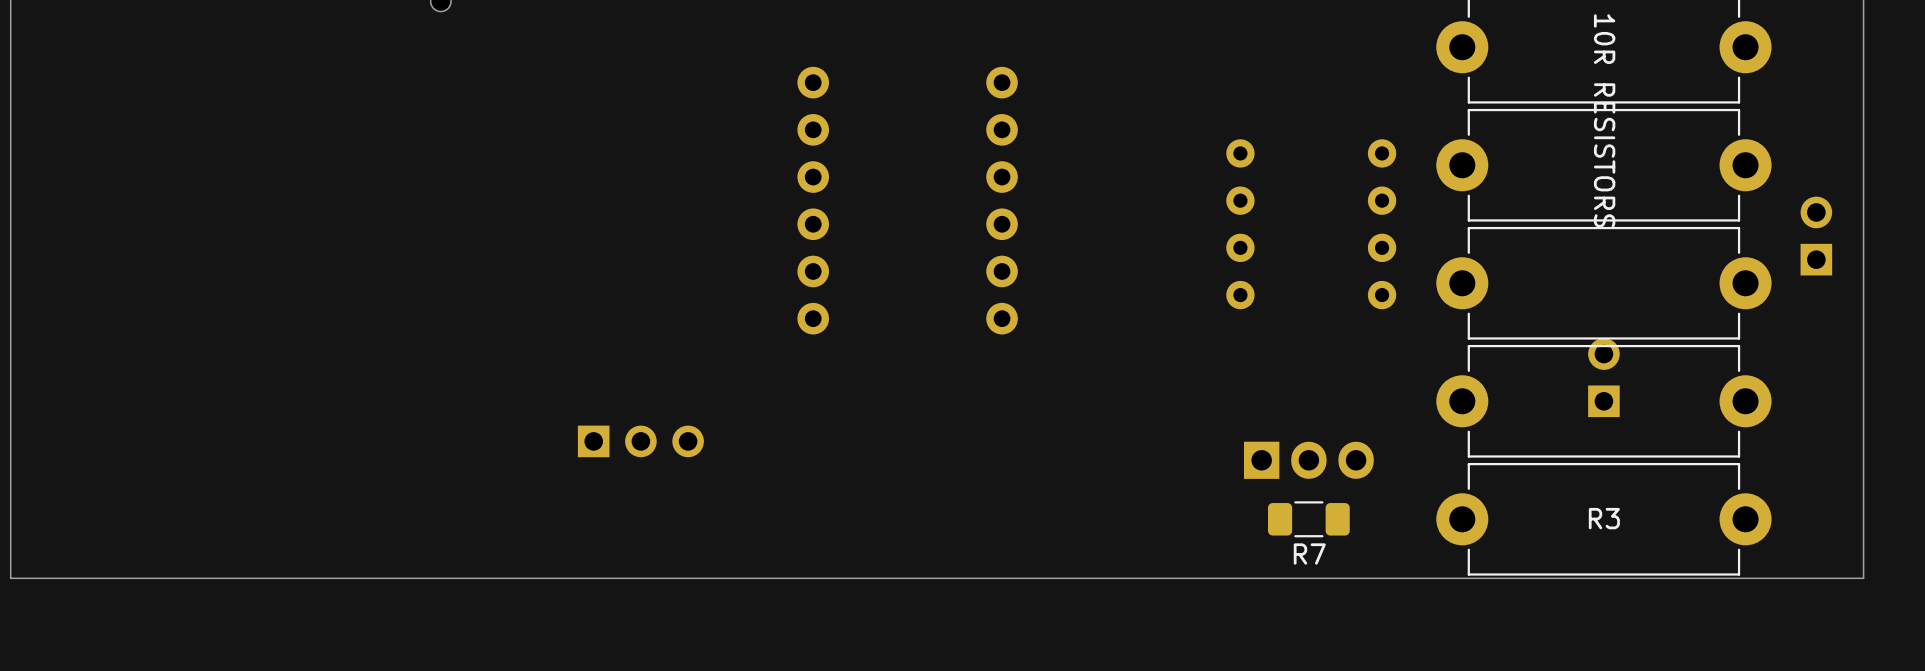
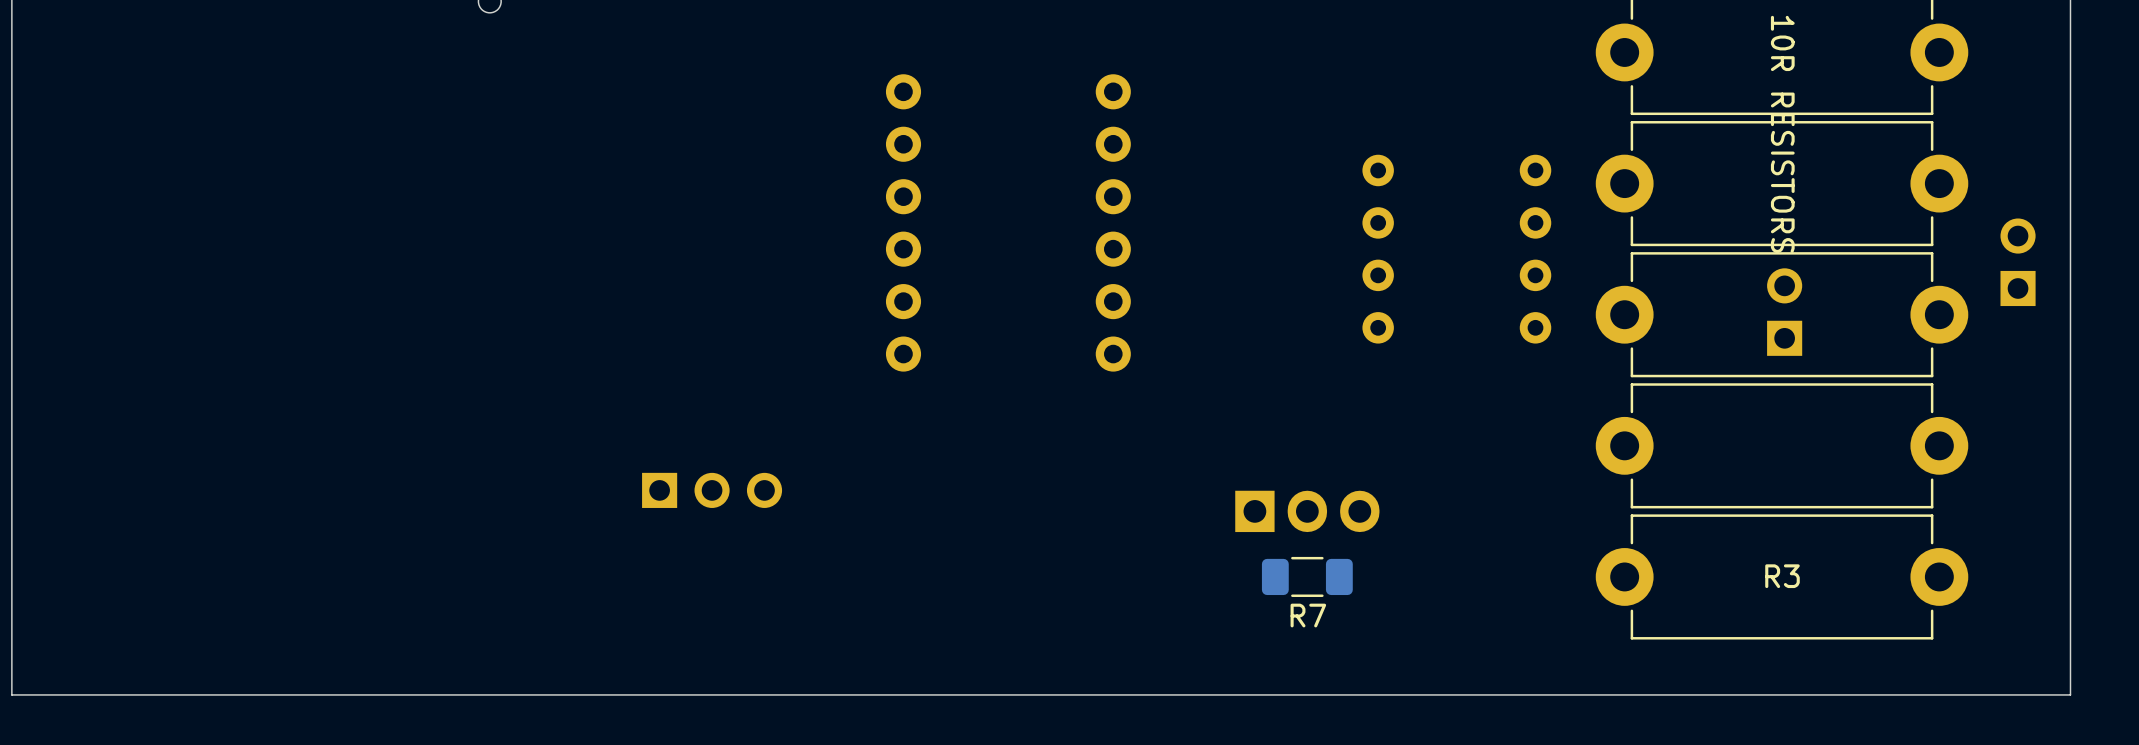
part position: (1603, 377) -> (1784, 312)
part position: (1308, 460) -> (1307, 511)
R7 position: (1308, 519) -> (1307, 576)
board edge: (1863, 578) (10, 578) -> (2070, 642) (2070, 694) (11, 694) (11, 642)

